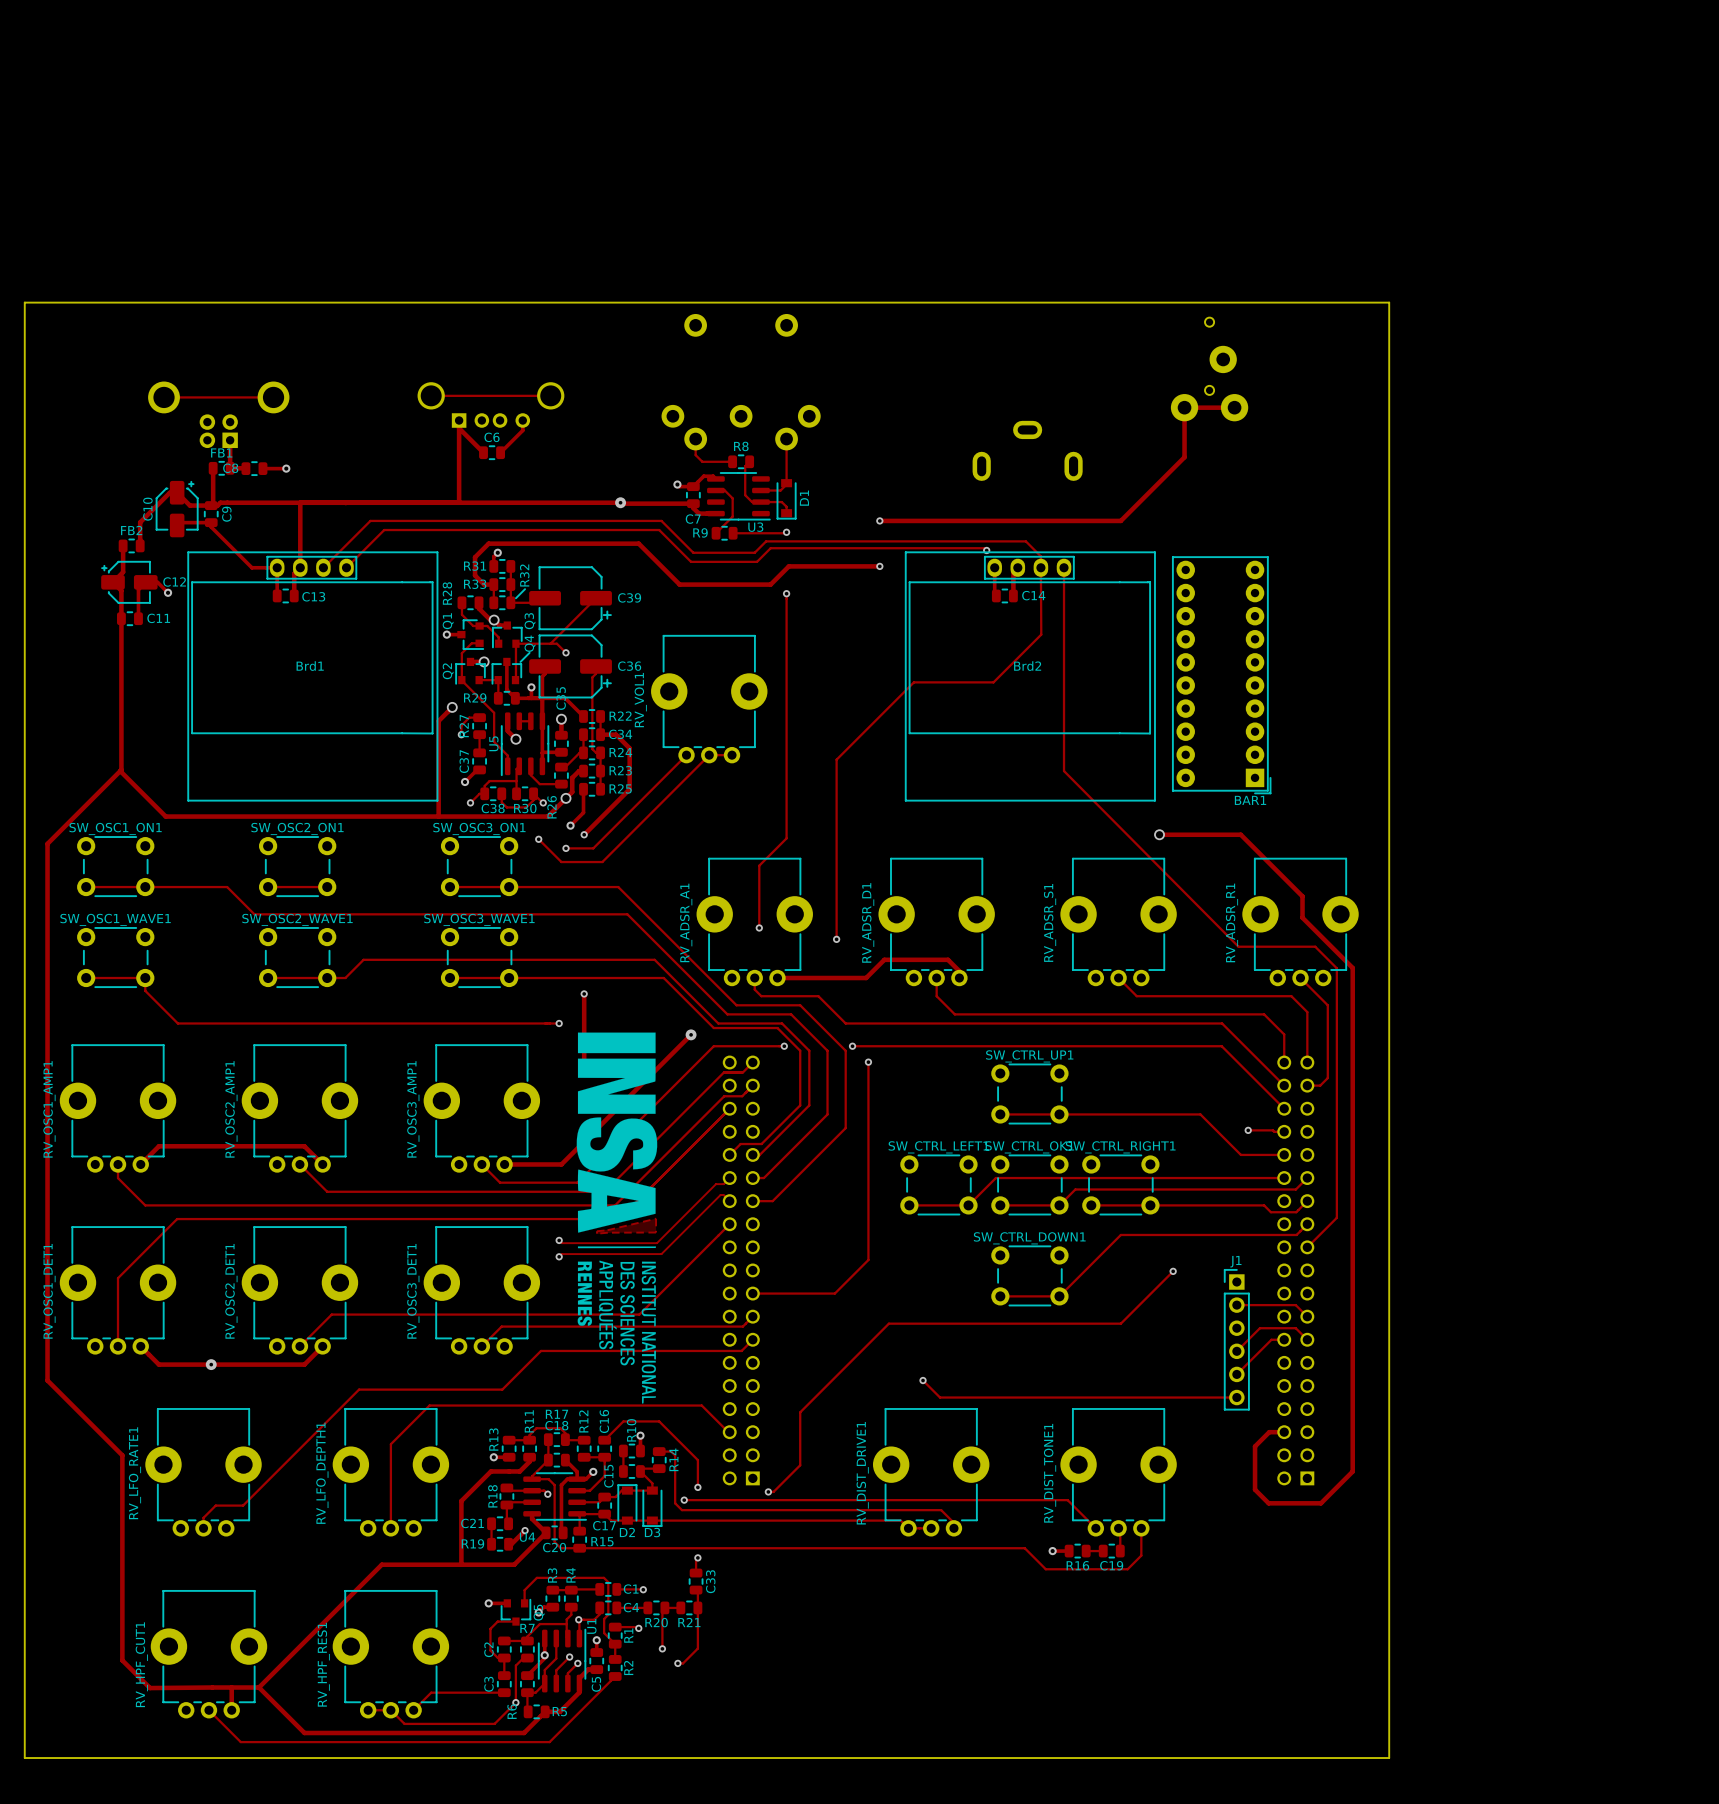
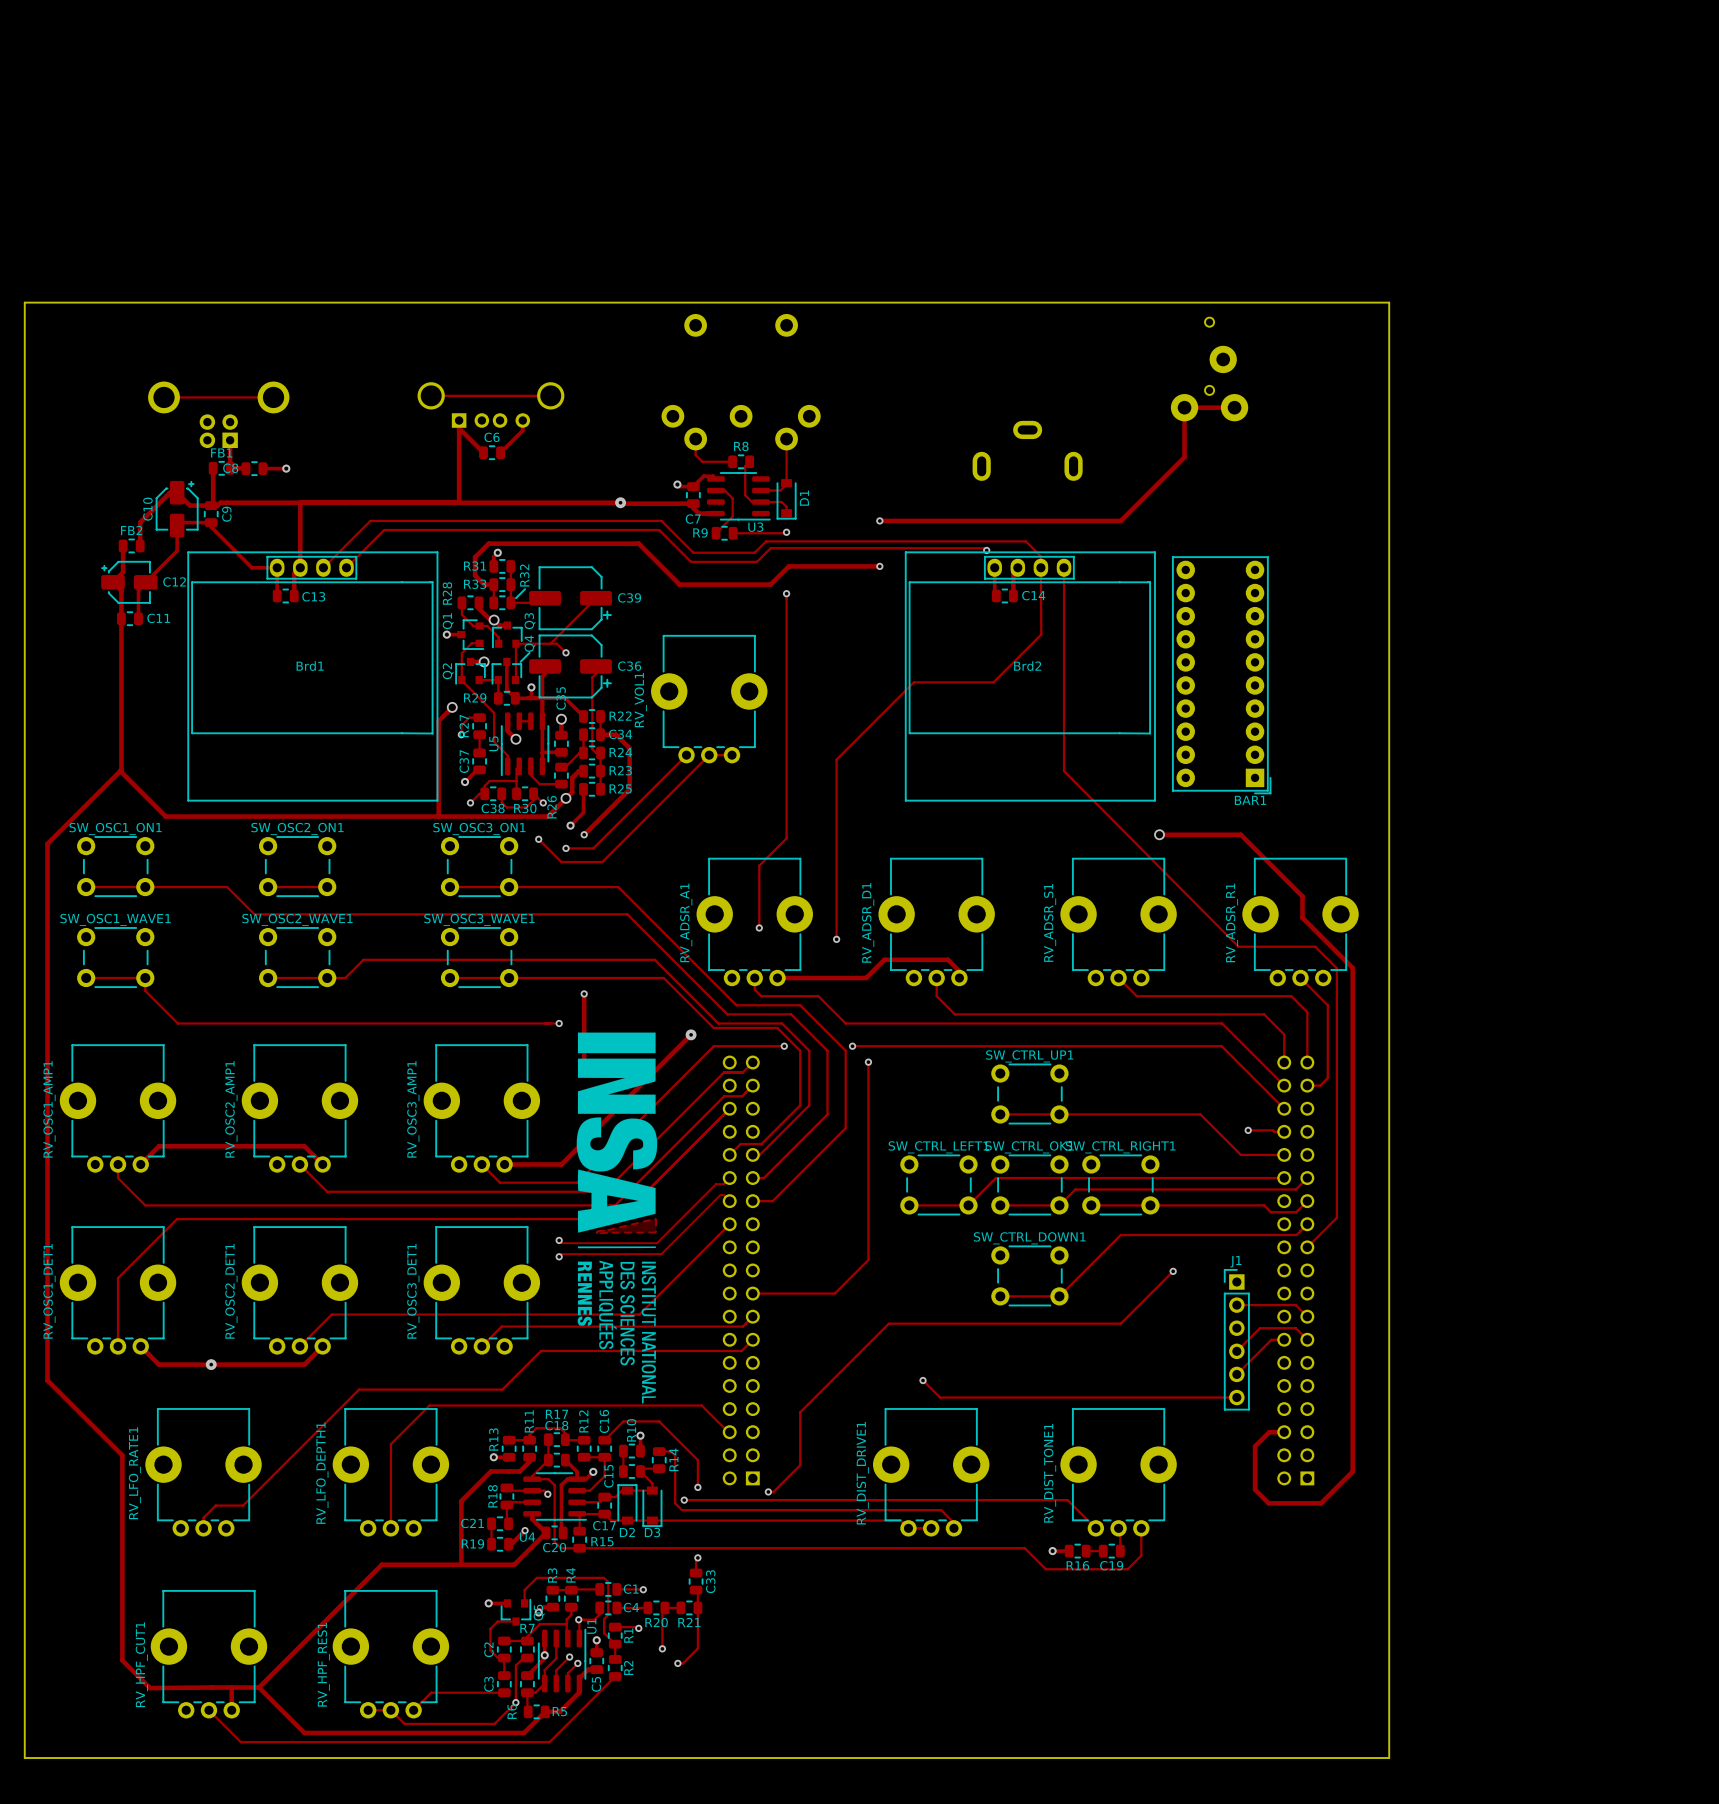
track: (145, 582) (157, 582) (168, 592) -> (145, 582) (177, 550) (177, 525)
via: (168, 592) -> none

